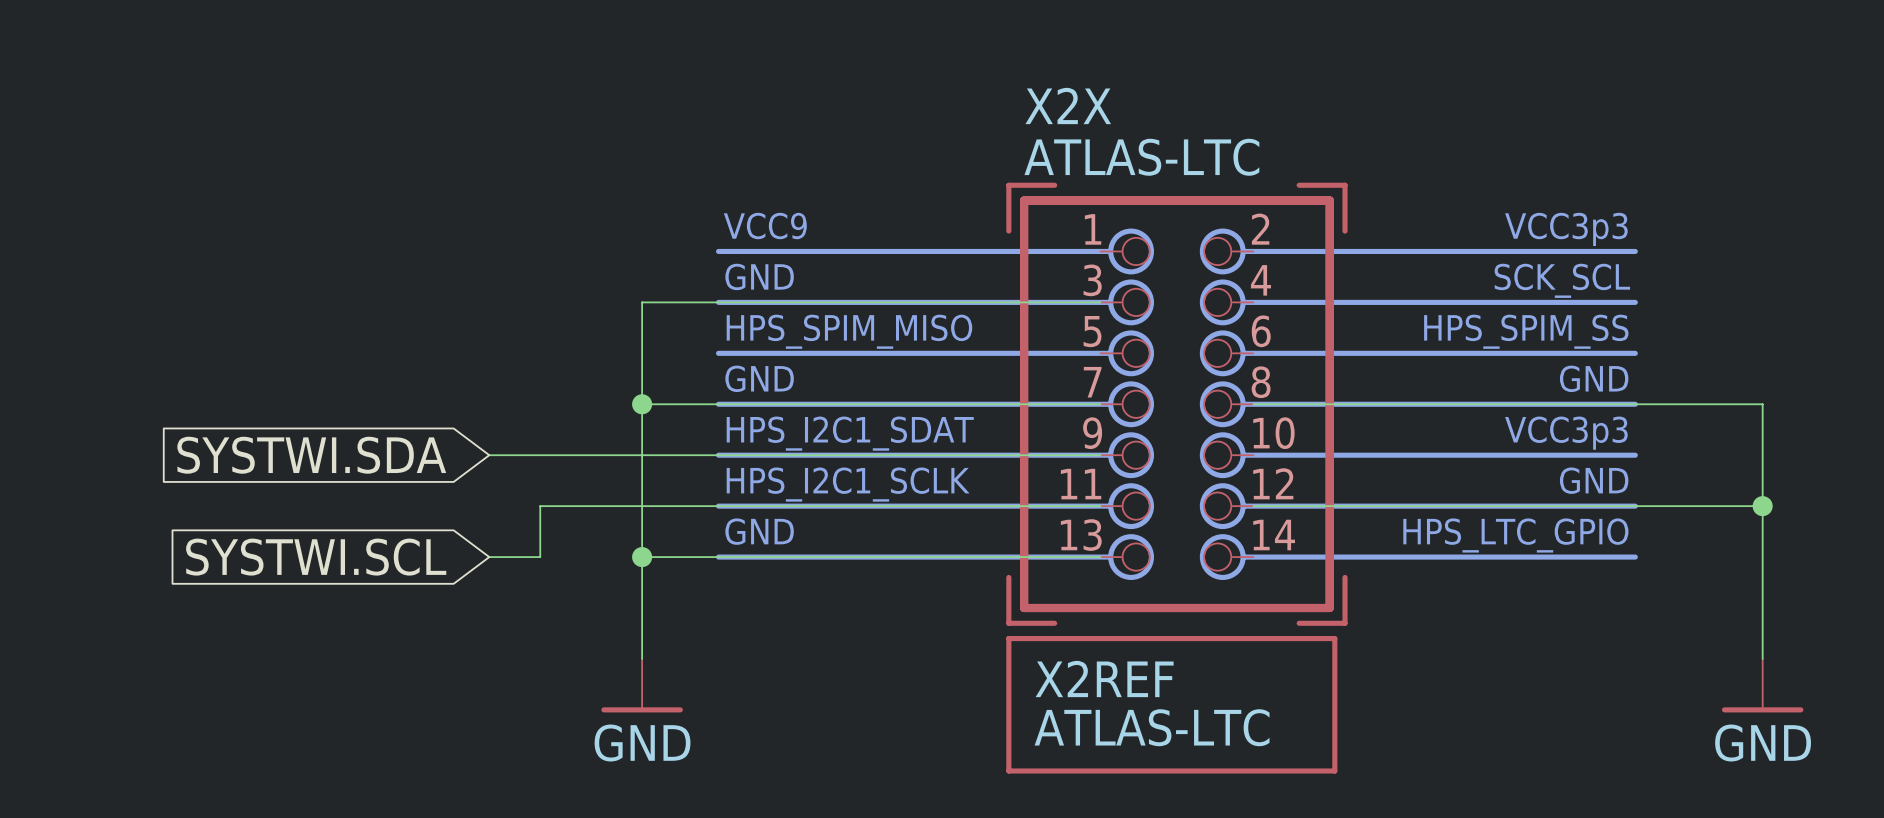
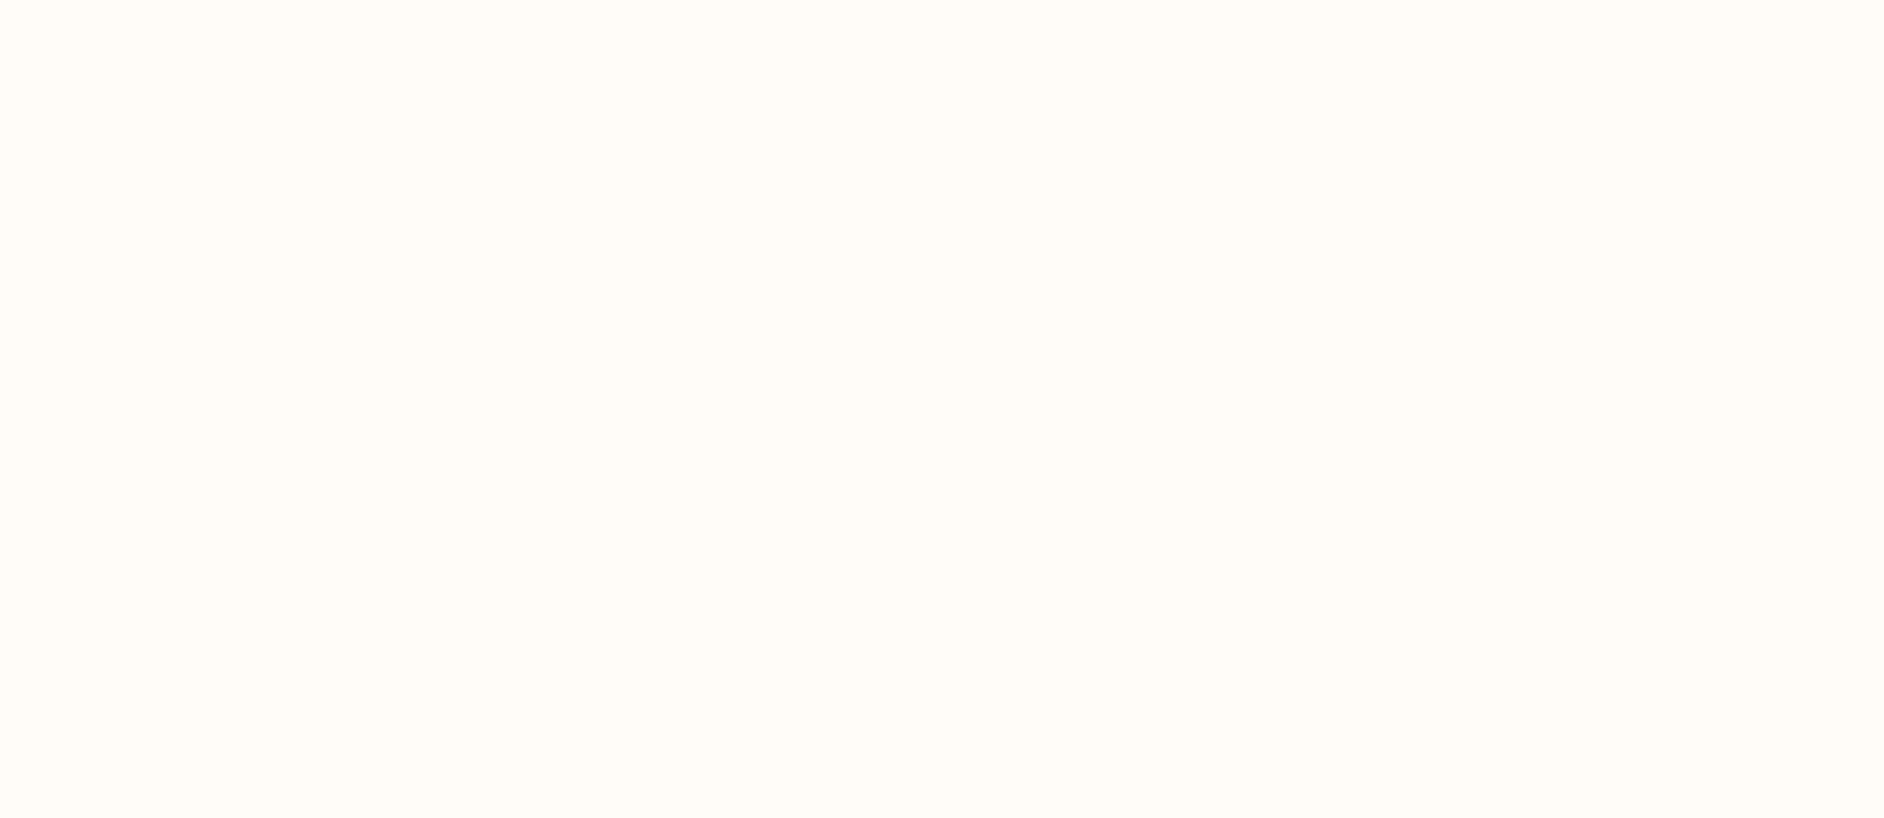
wire: (1100, 302) (642, 302) (642, 658) -> none
wire: (642, 404) (1100, 404) -> none
junction: (642, 404) -> none
X2X: ATLAS-LTC (1176, 404) -> none
wire: (1253, 404) (1762, 404) (1762, 658) -> none
global label: SYSTWI.SDA (311, 455) -> none
wire: (489, 455) (1100, 455) -> none
X2REF: ATLAS-LTC (1176, 478) -> none
wire: (1100, 506) (540, 506) (540, 557) (489, 557) -> none
wire: (1253, 506) (1762, 506) -> none
junction: (1762, 506) -> none
global label: SYSTWI.SCL (316, 557) -> none
wire: (642, 557) (1100, 557) -> none
junction: (642, 557) -> none
power symbol: GND (642, 685) -> none
power symbol: GND (1762, 685) -> none

